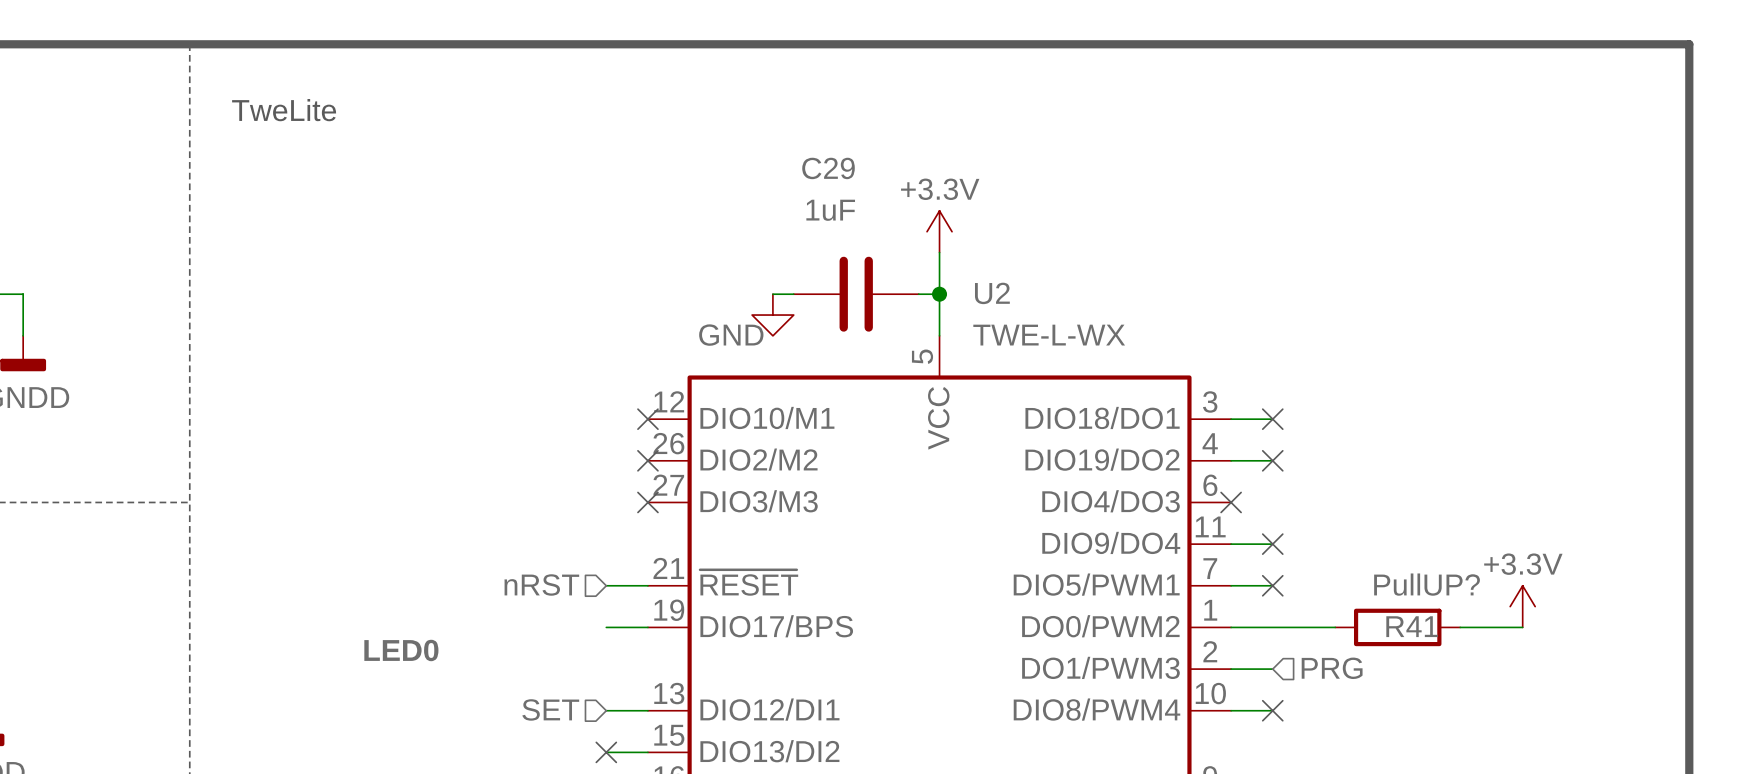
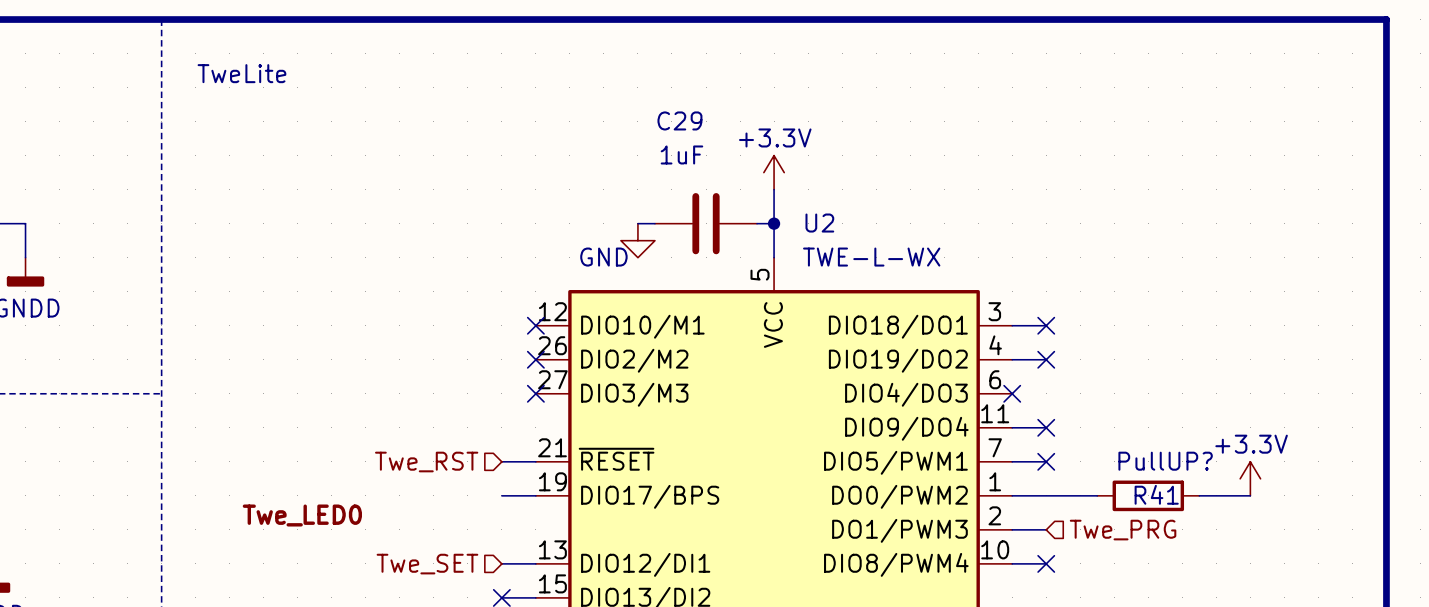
hierarchical label: nRST (541, 584) -> Twe_RST (426, 462)
label: LED0 (401, 650) -> Twe_LED0 (302, 515)
hierarchical label: PRG (1332, 668) -> Twe_PRG (1123, 530)
hierarchical label: SET (550, 709) -> Twe_SET (427, 564)

